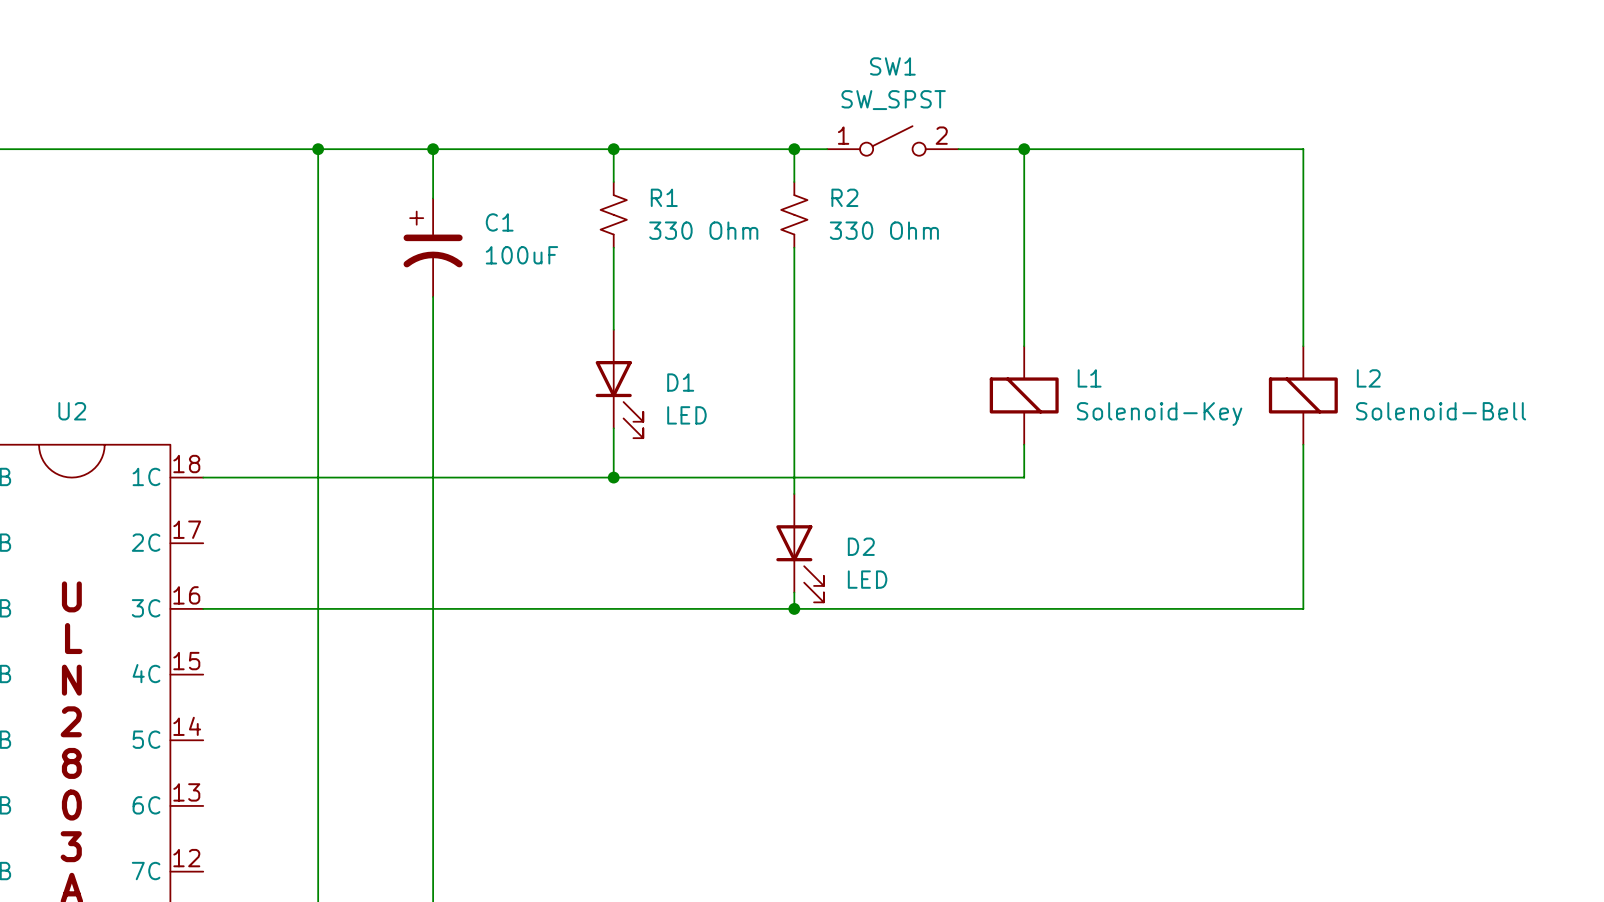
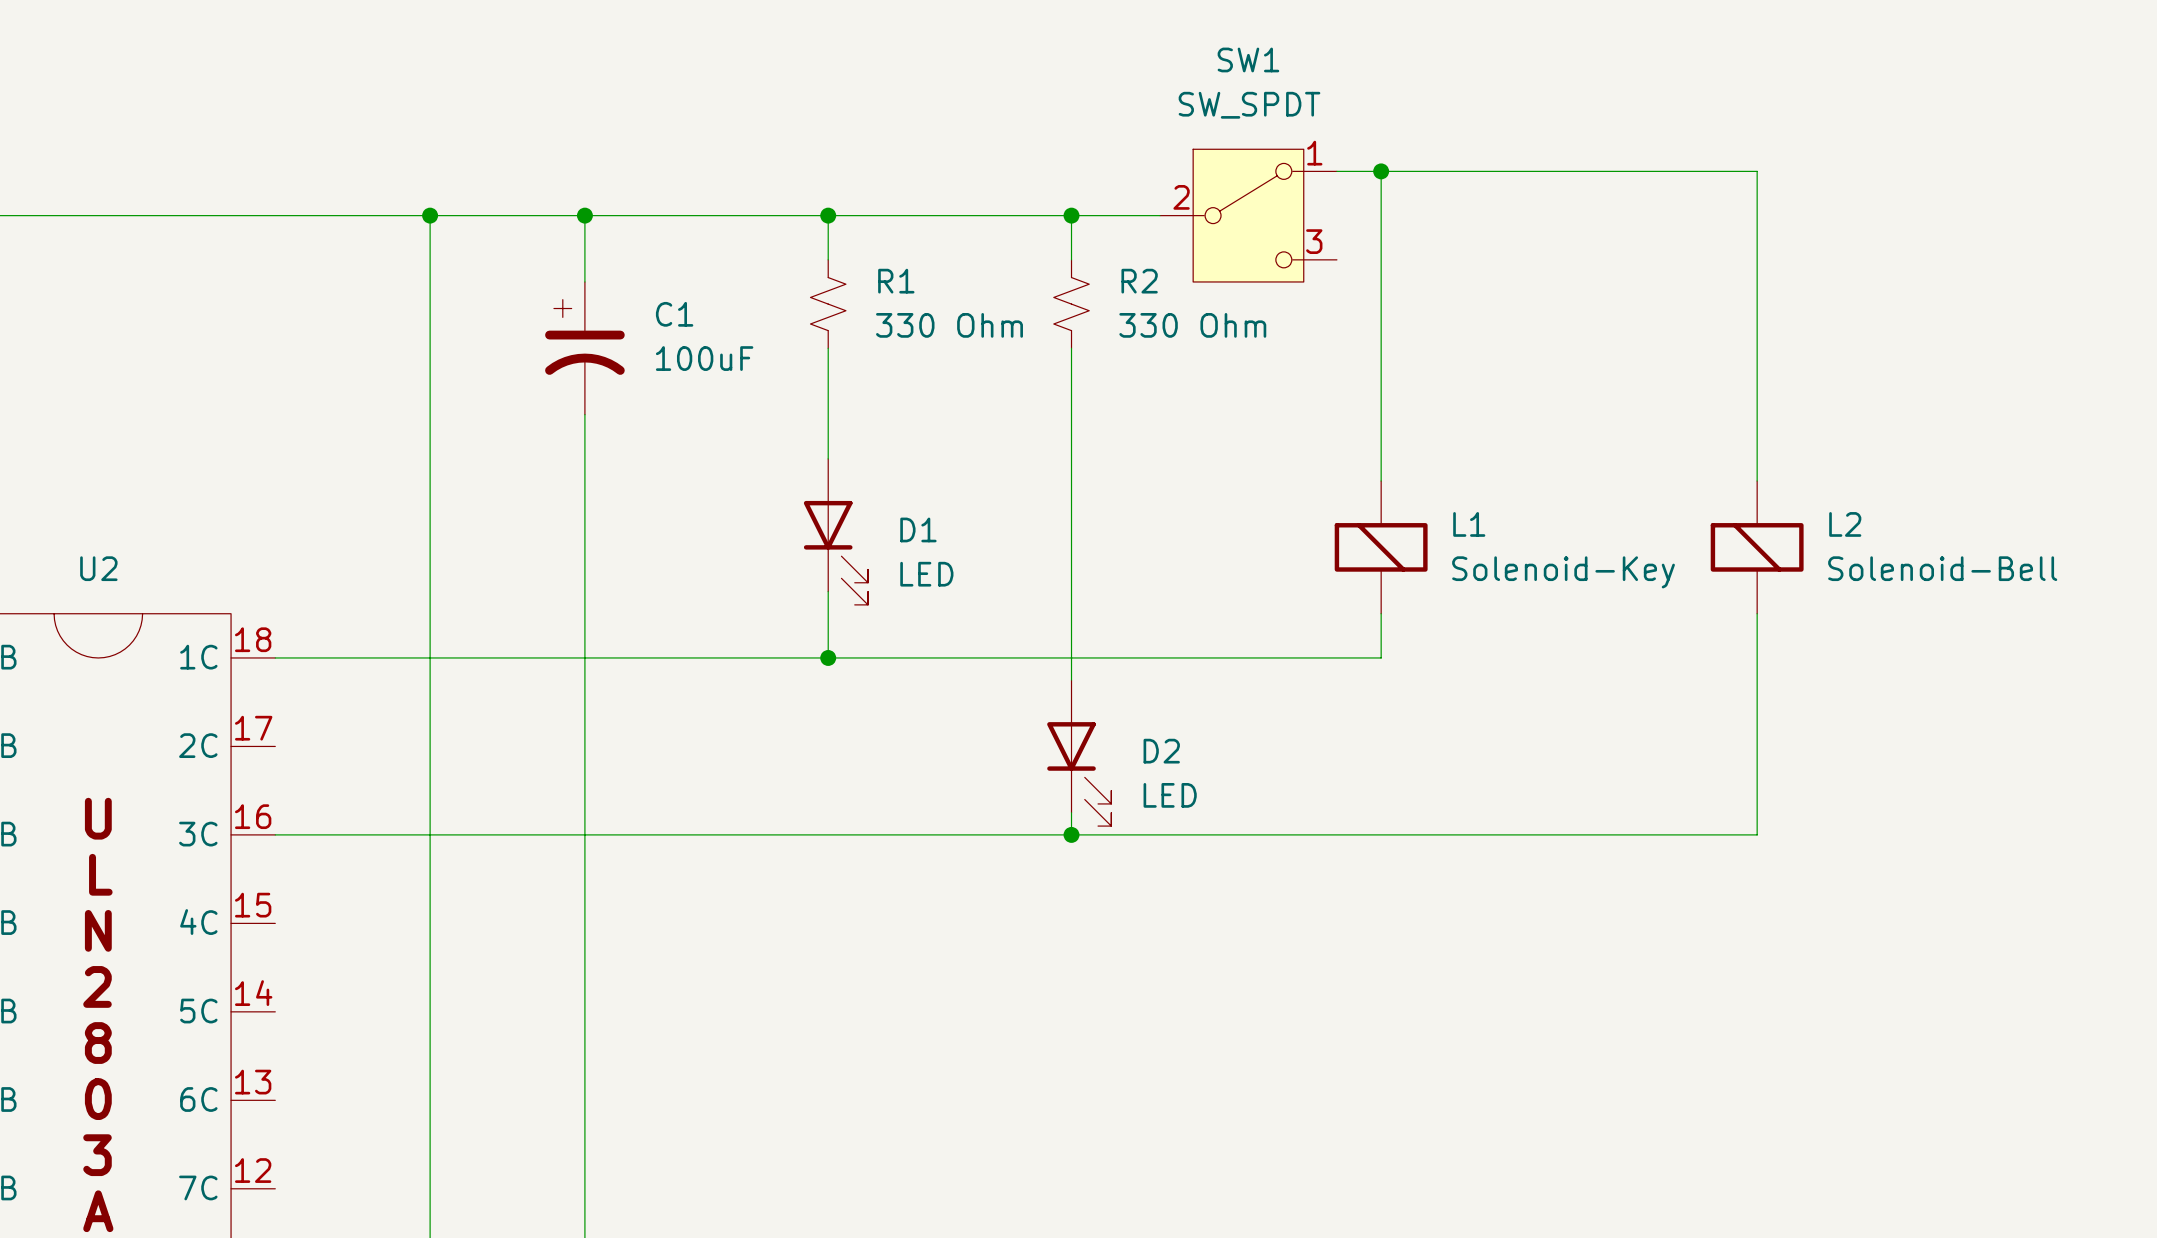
SW1 name position: SW1 (892, 66) -> SW1 (1248, 59)
SW1 value: SW_SPST (893, 100) -> SW_SPDT (1249, 105)
wire: none -> (1381, 171) (1381, 215)
SW1 symbol: [827, 126, 959, 156] -> [1159, 149, 1337, 282]
wire: (958, 149) (1303, 149) -> (1336, 171) (1757, 171) (1757, 215)
junction position: (1024, 149) -> (1381, 171)

